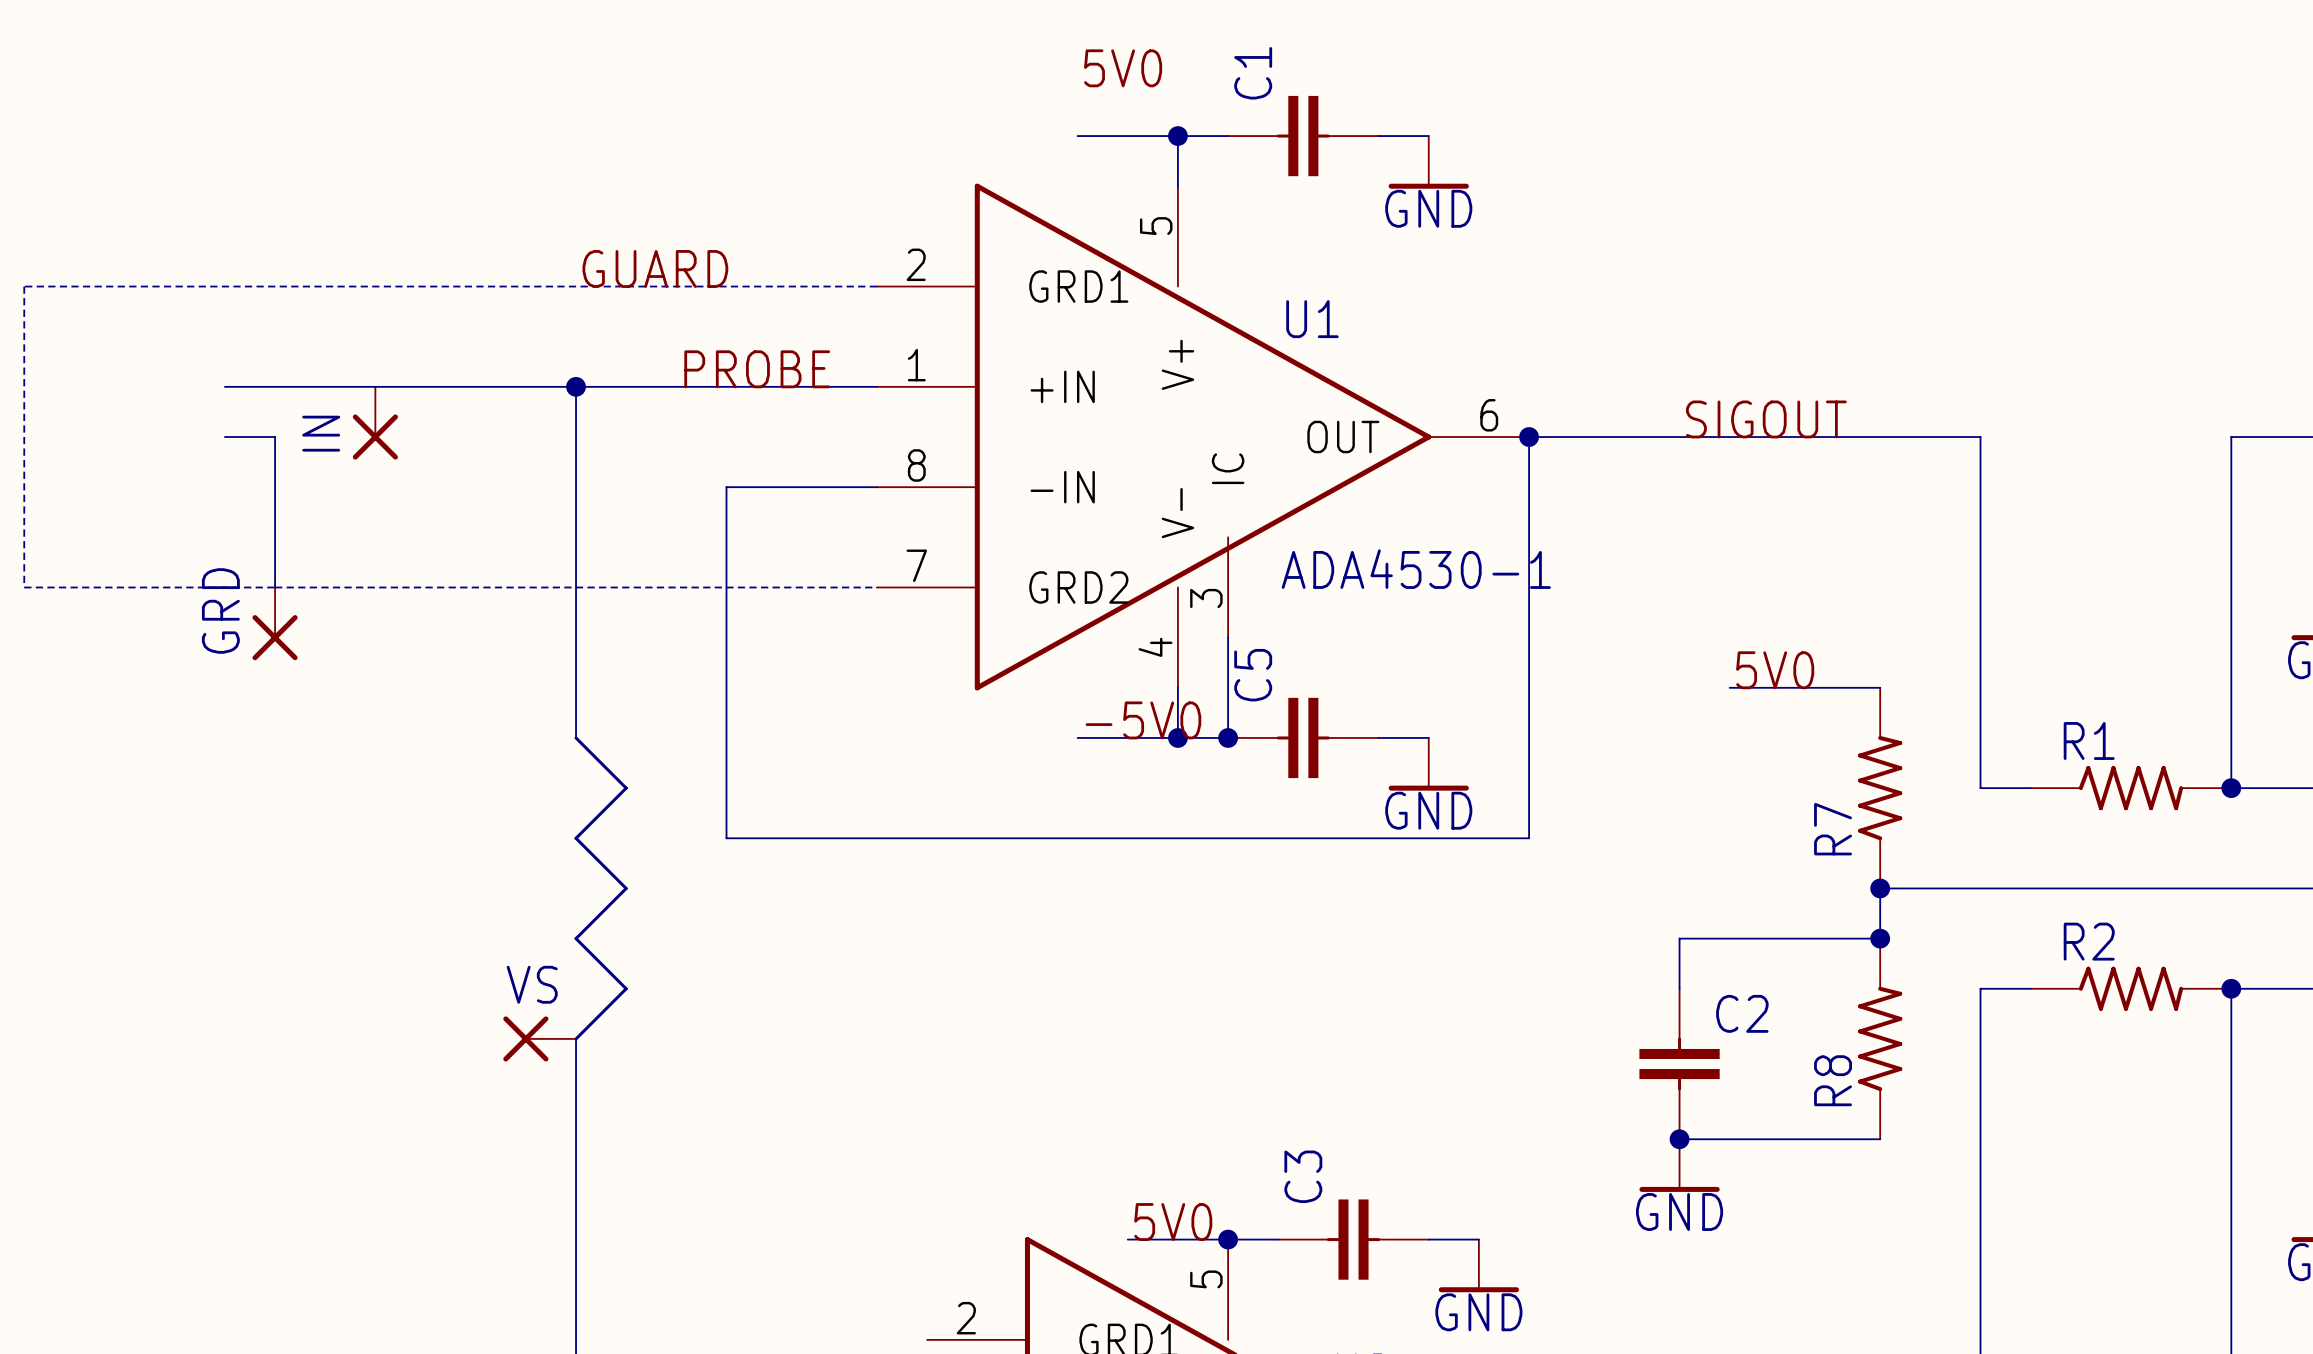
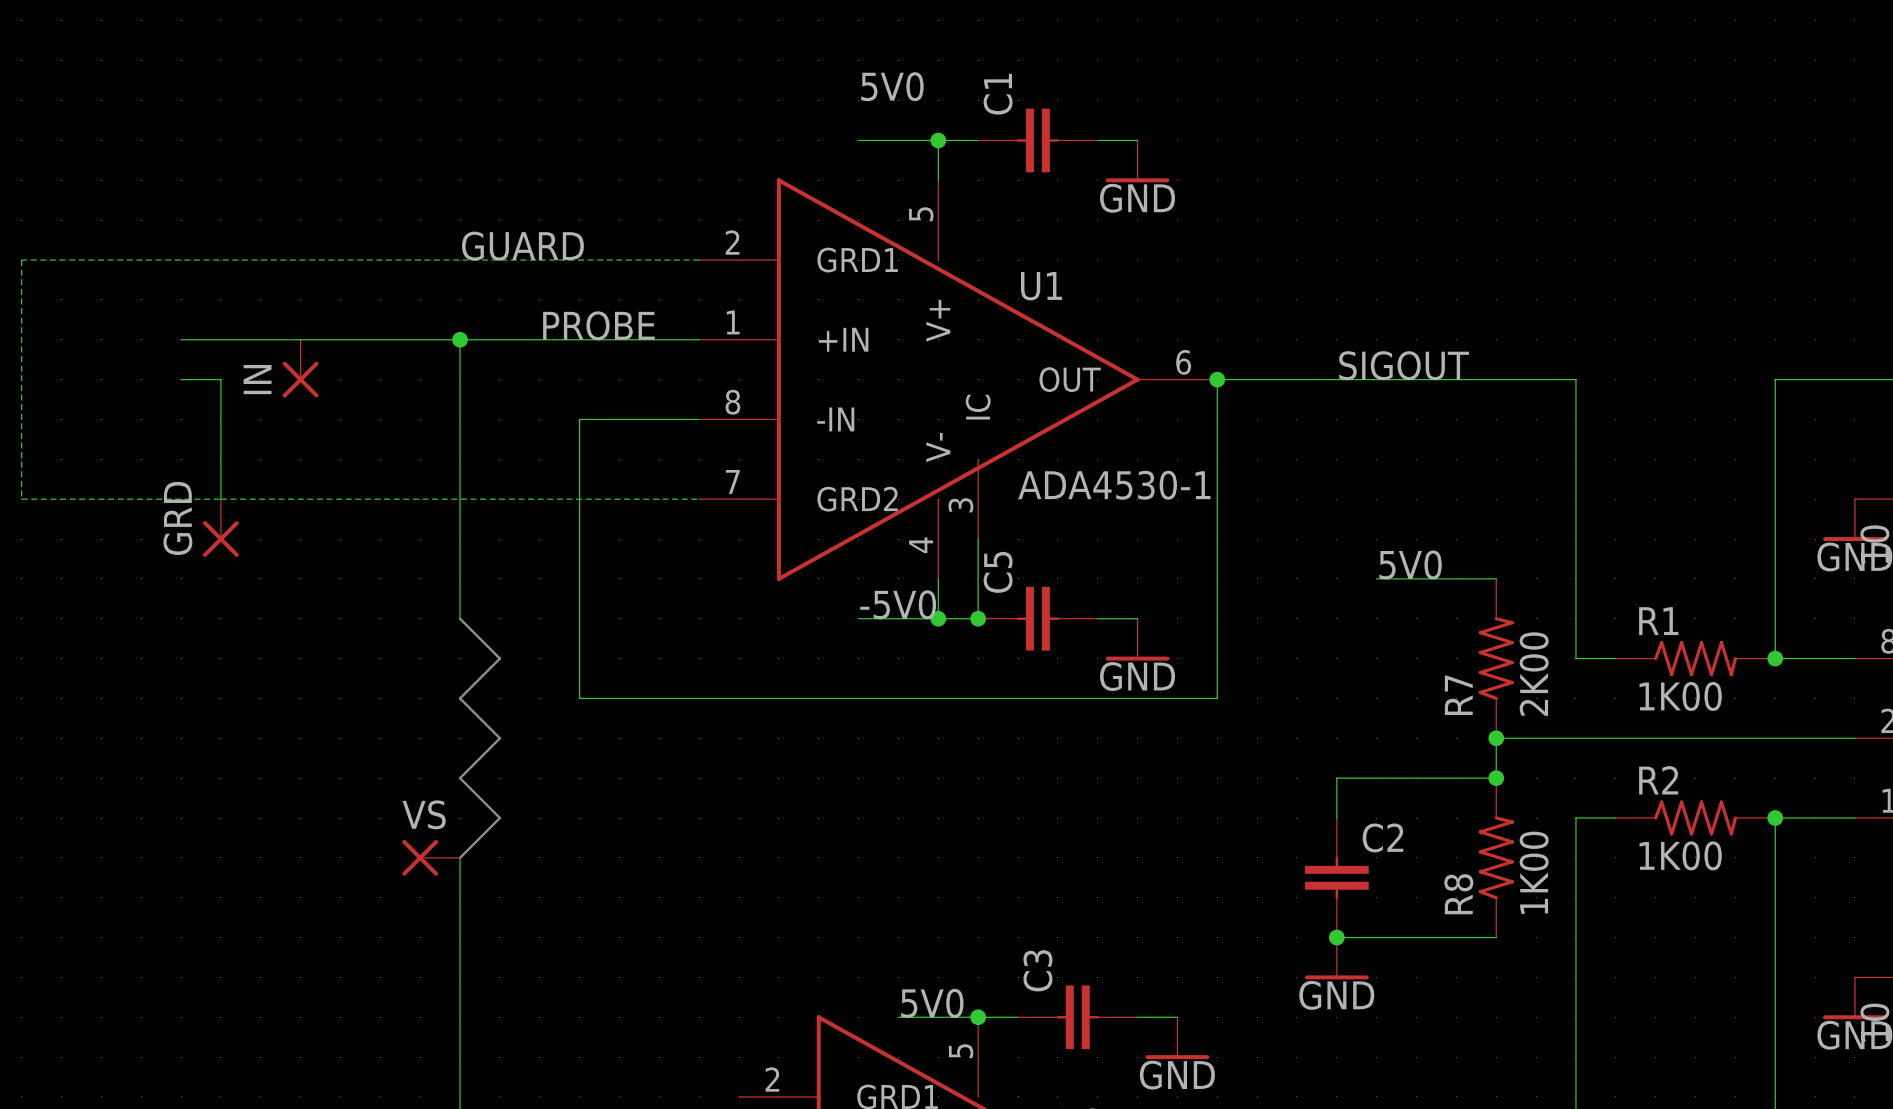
R7 value: none -> 2K00 (1534, 674)
R1 value: none -> 1K00 (1680, 696)
R2 value: none -> 1K00 (1680, 855)
R8 value: none -> 1K00 (1534, 872)

